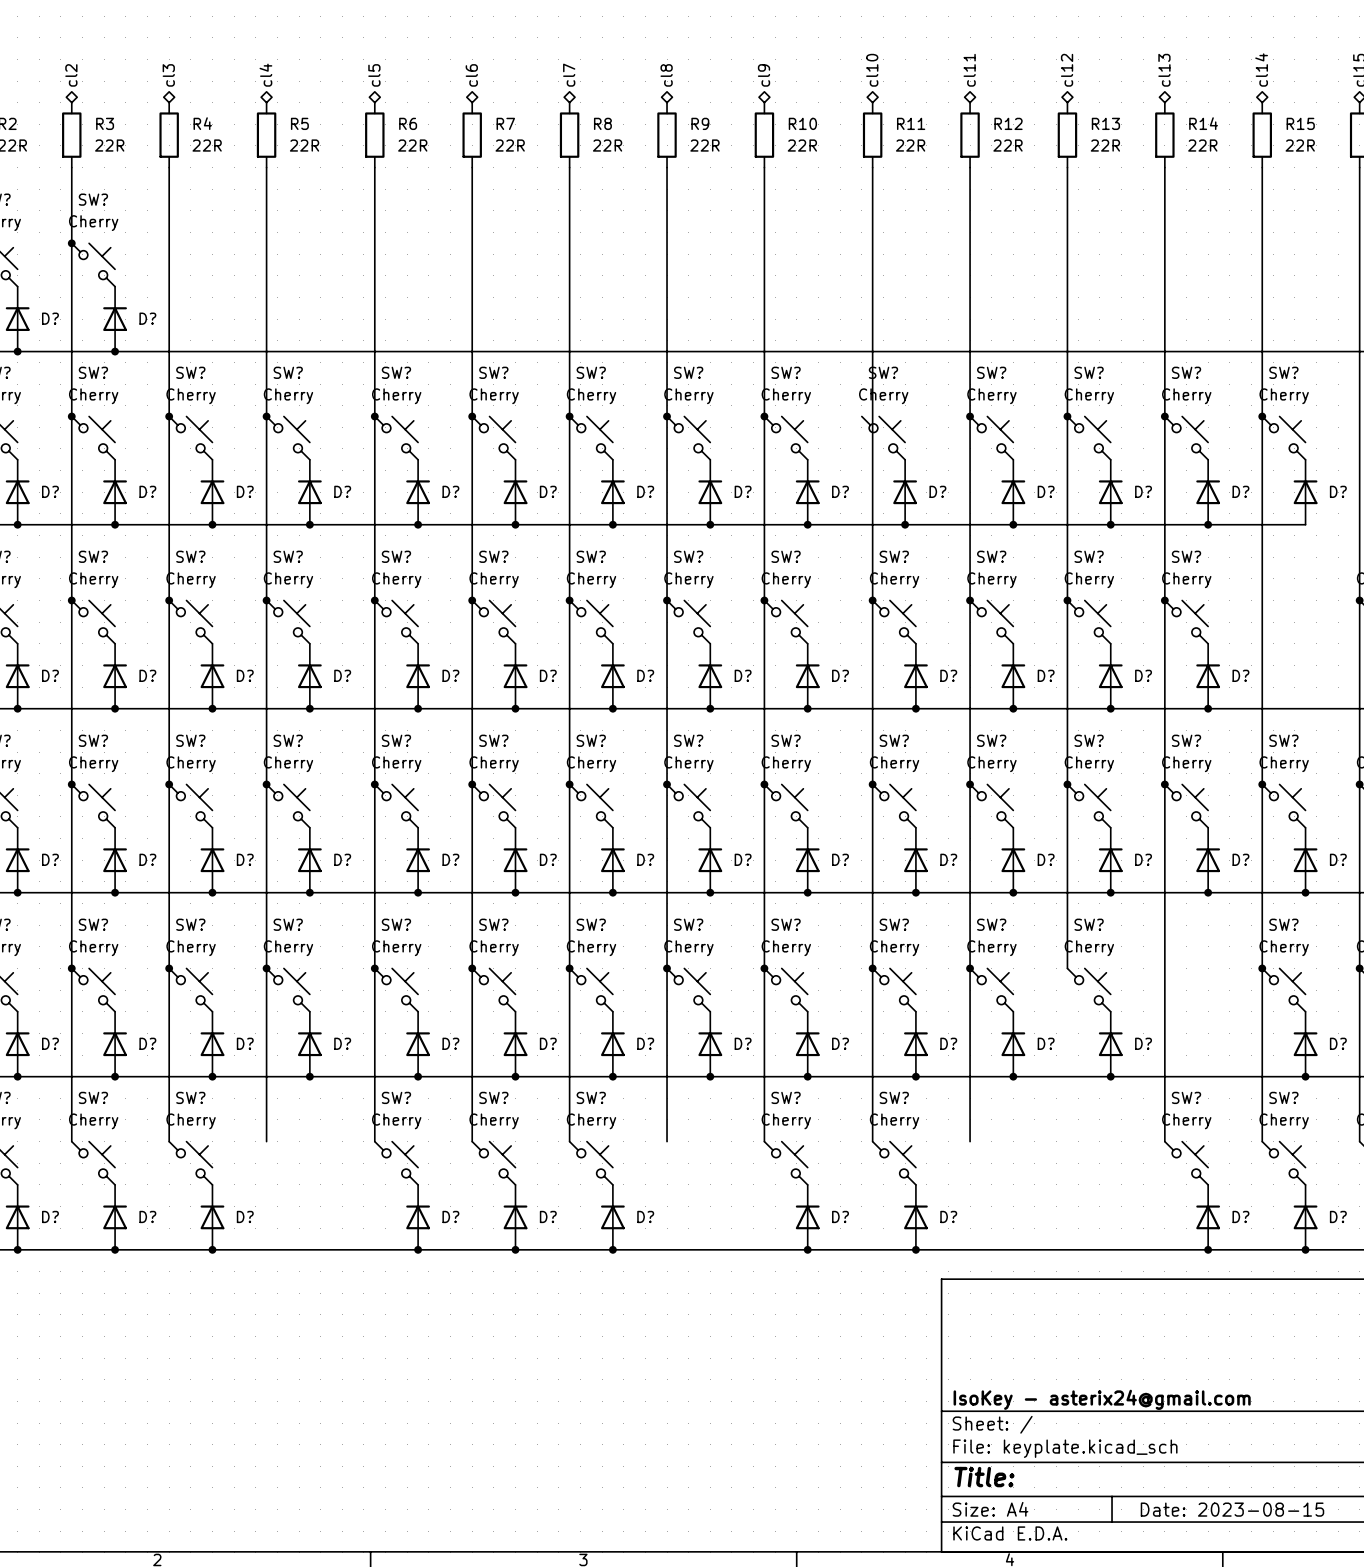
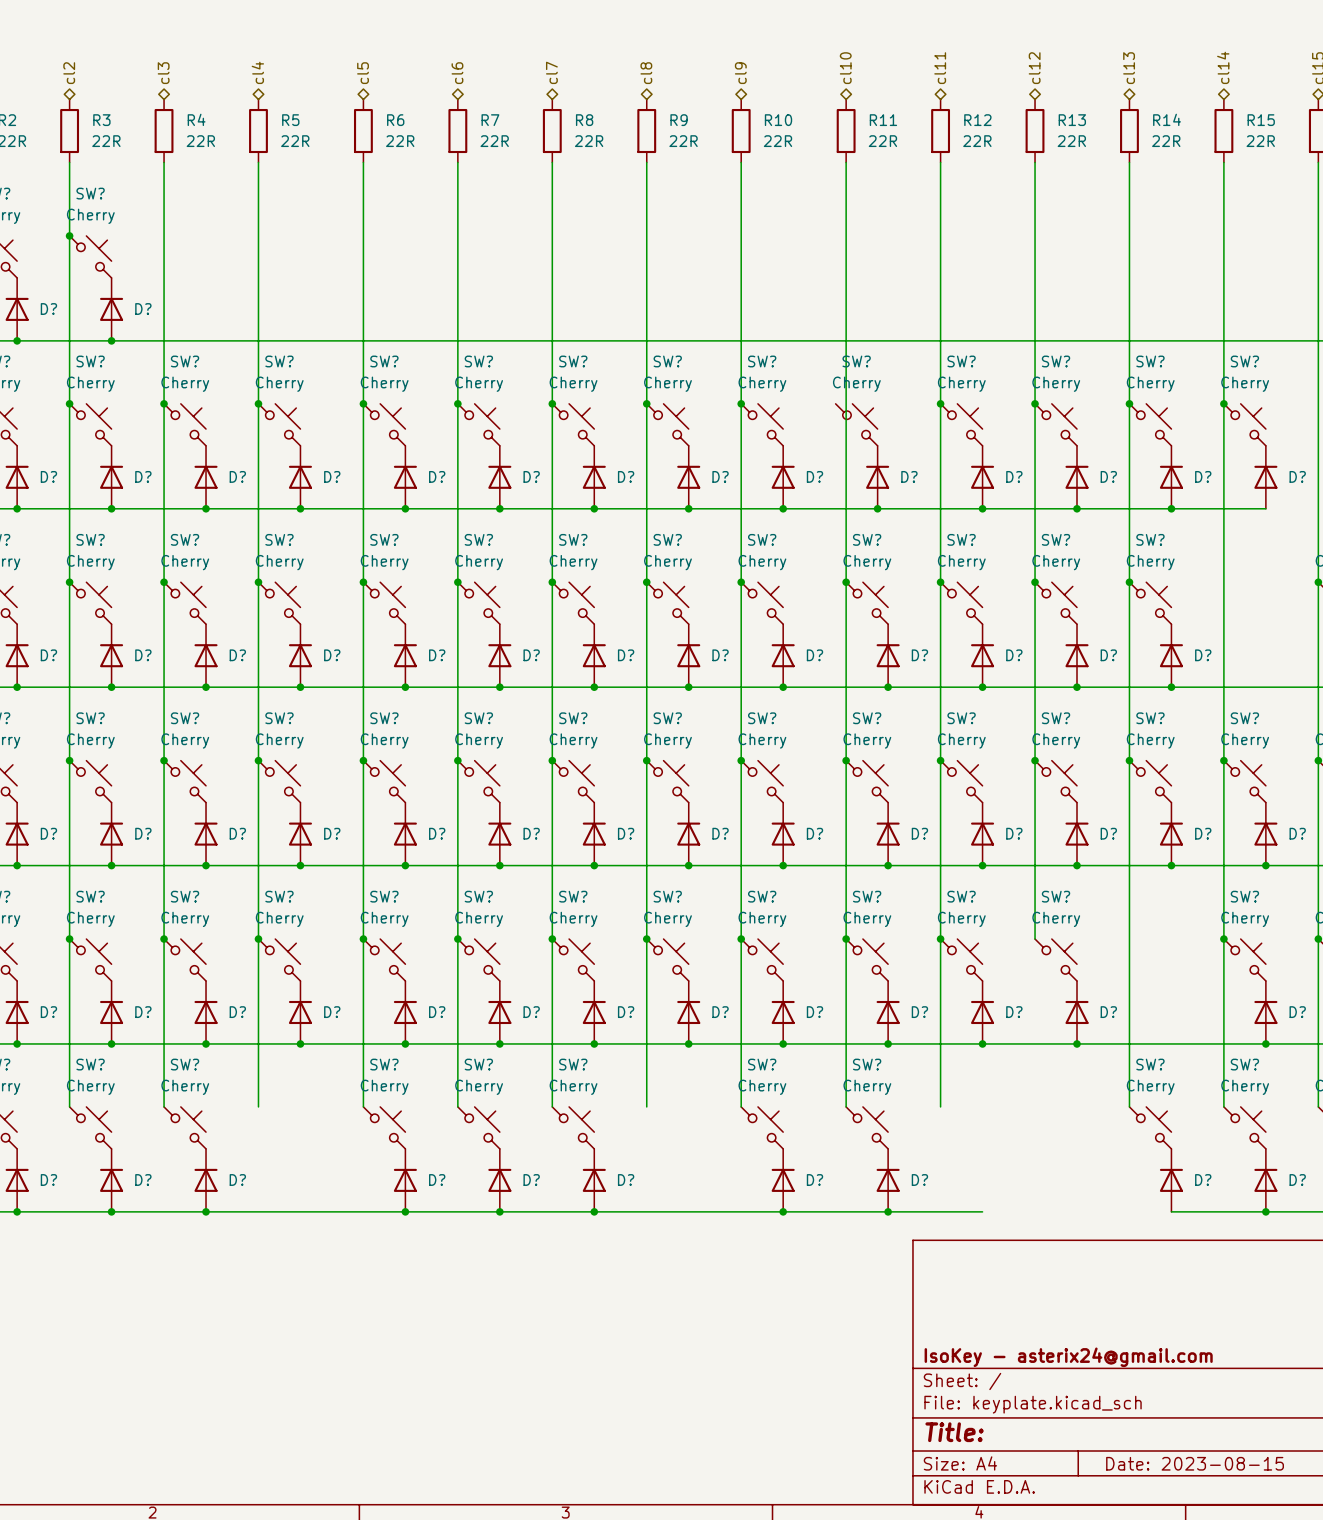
wire: (1013, 1249) (1208, 1249) -> none
junction: (1208, 1249) -> none

